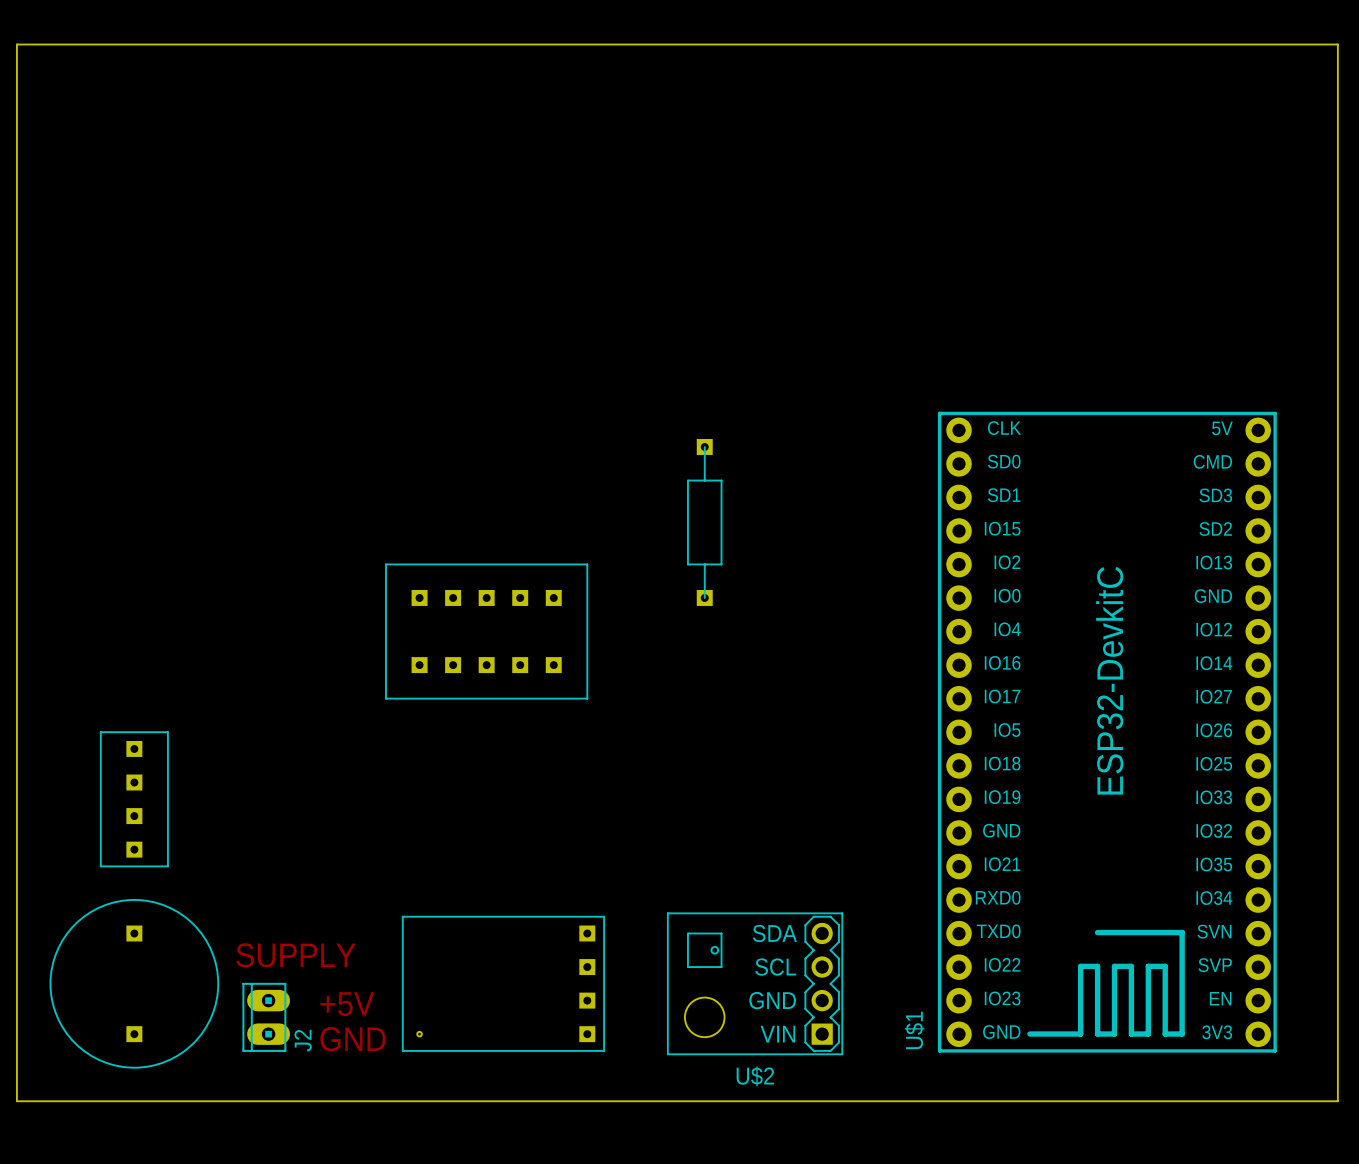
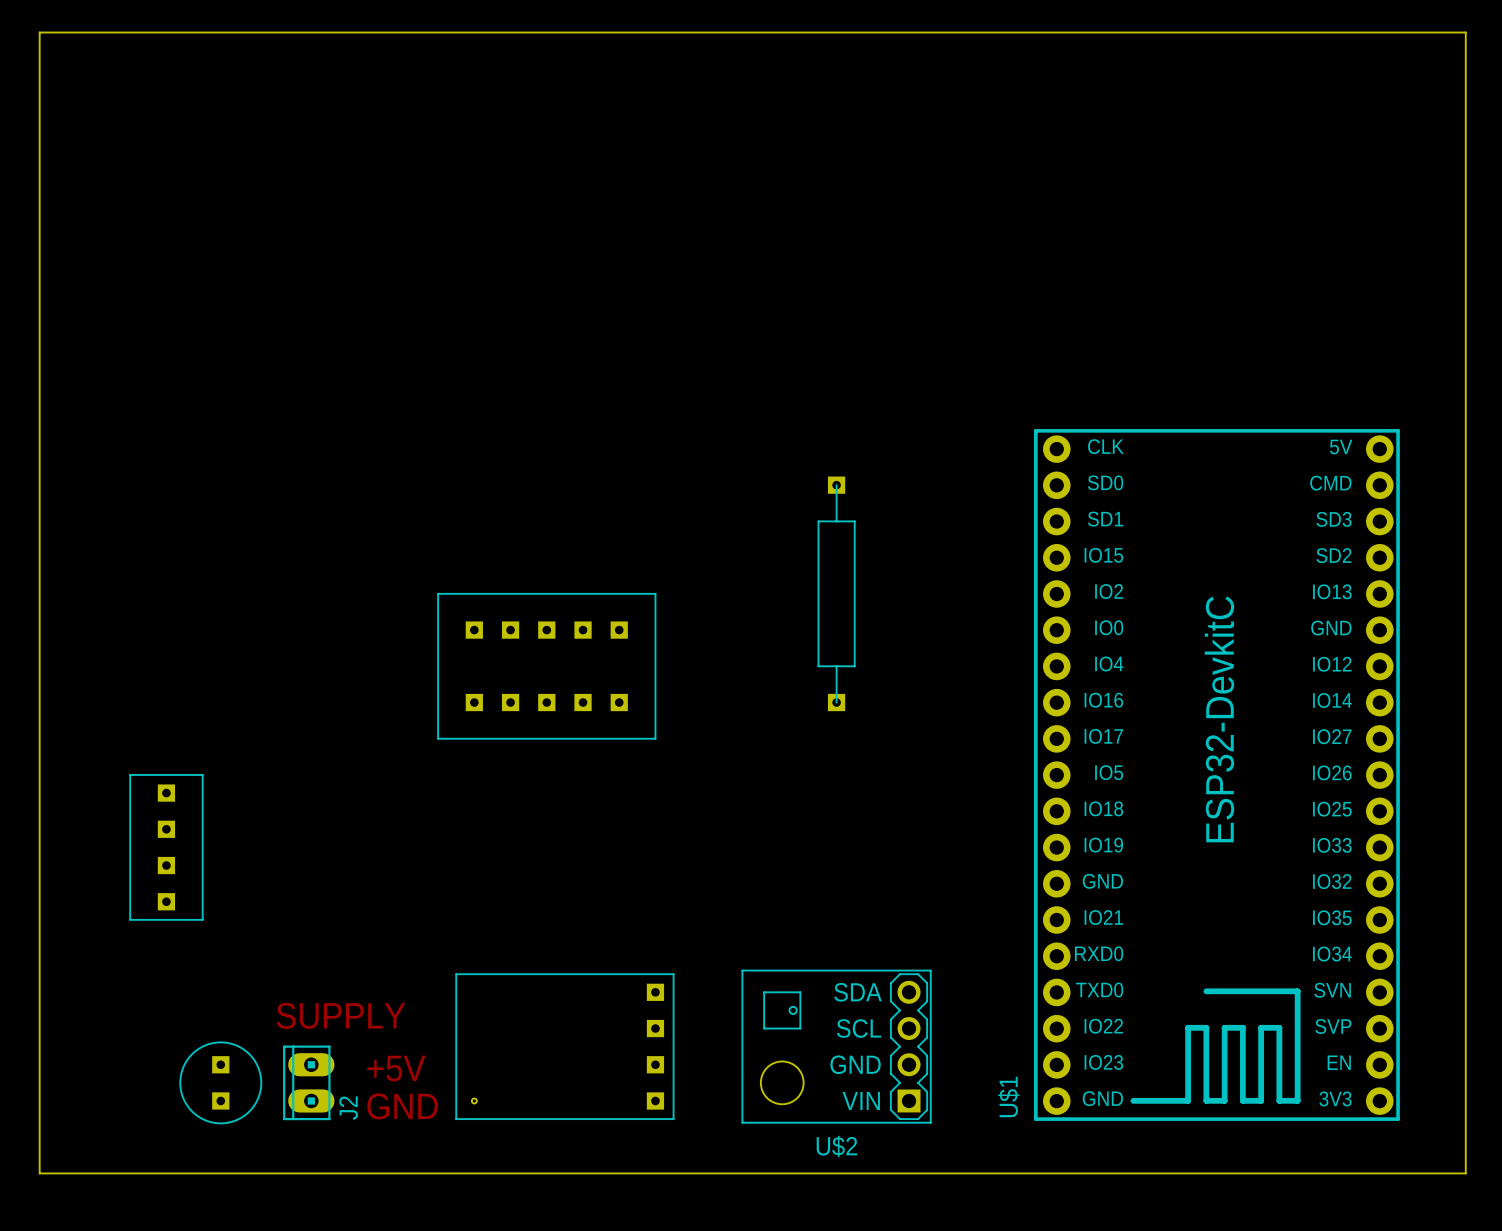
part: (704, 522) -> none
part: none -> (836, 593)
part: (134, 983) -> none
part: none -> (220, 1082)

